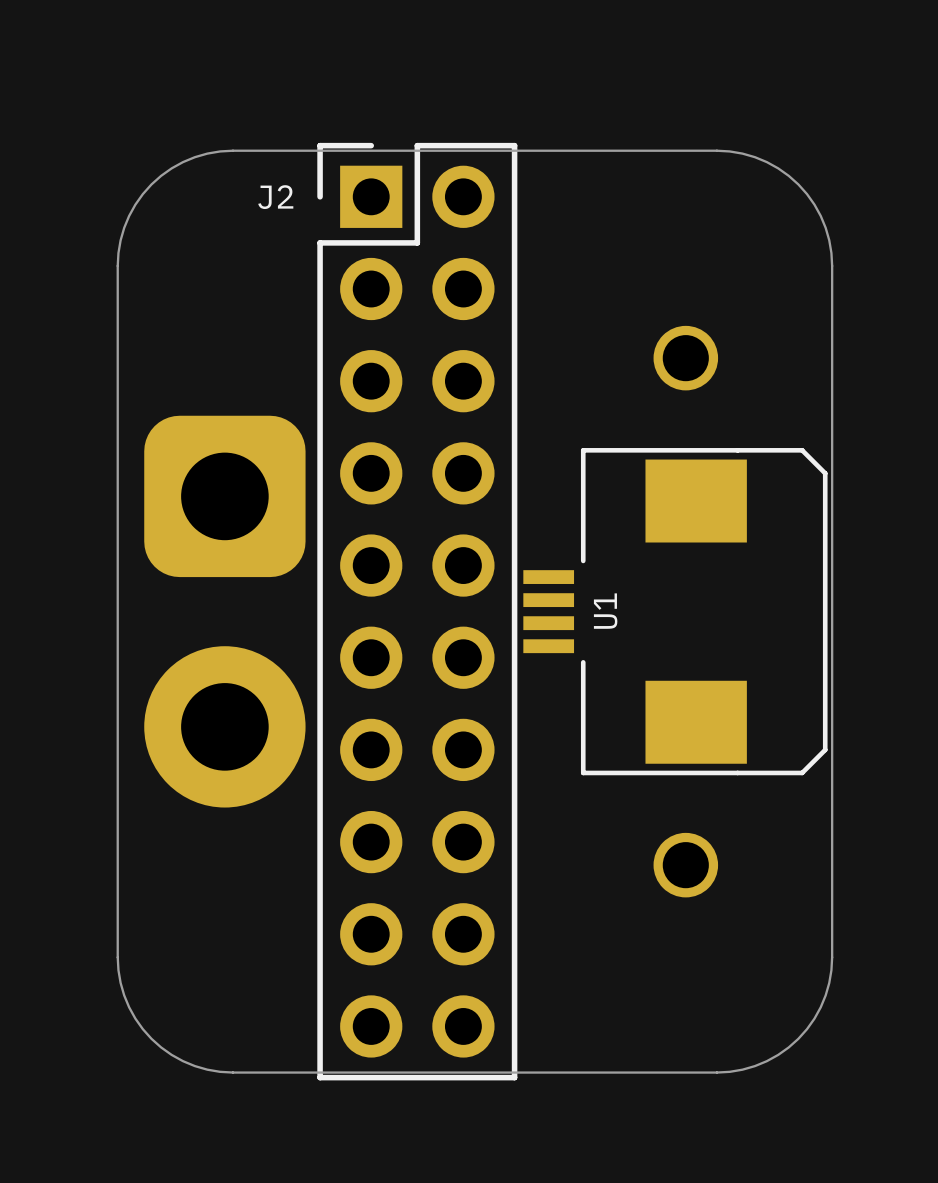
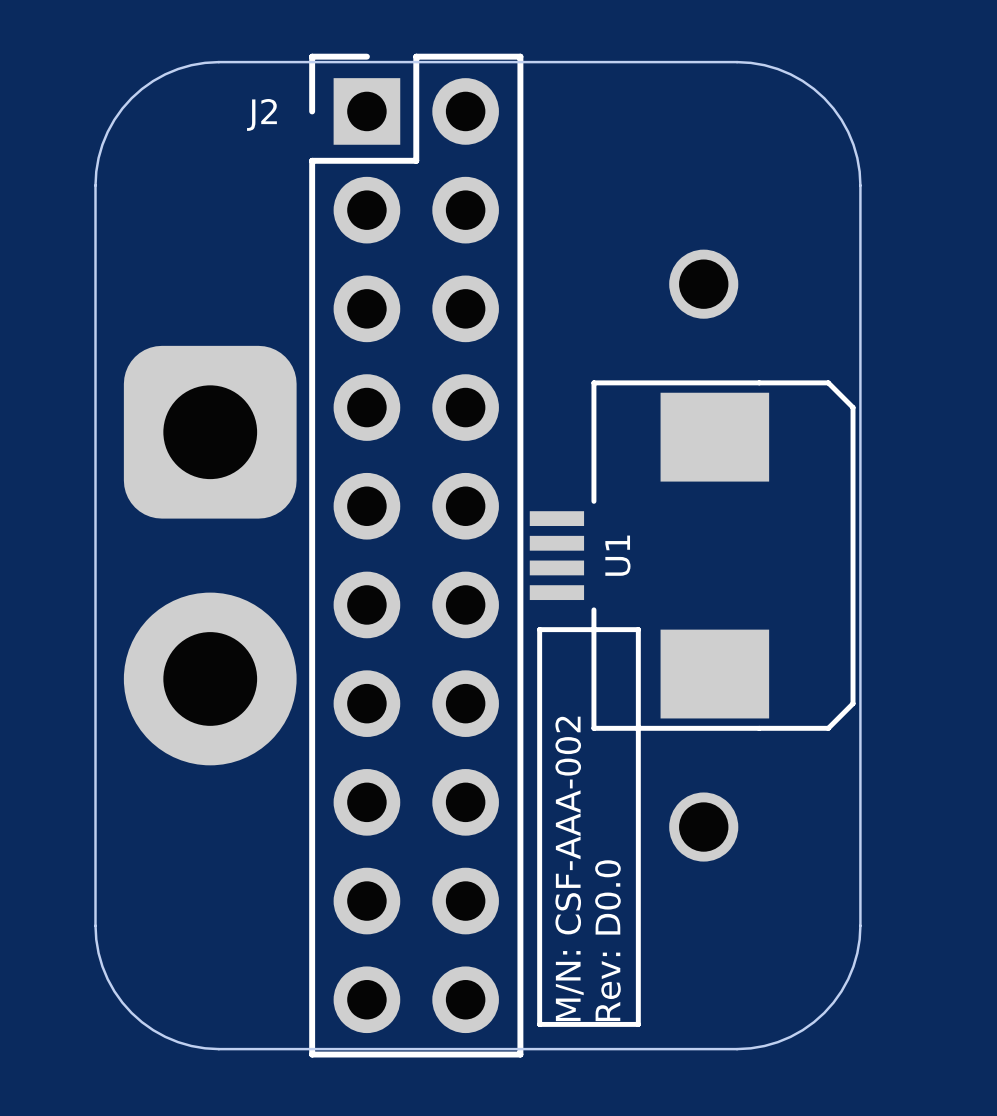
line: none -> (539, 629) (638, 629) (638, 1024) (539, 1024) (539, 629)
text: none -> M/N: CSF-AAA-002 (569, 868)
text: none -> Rev: D0.0 (607, 940)

